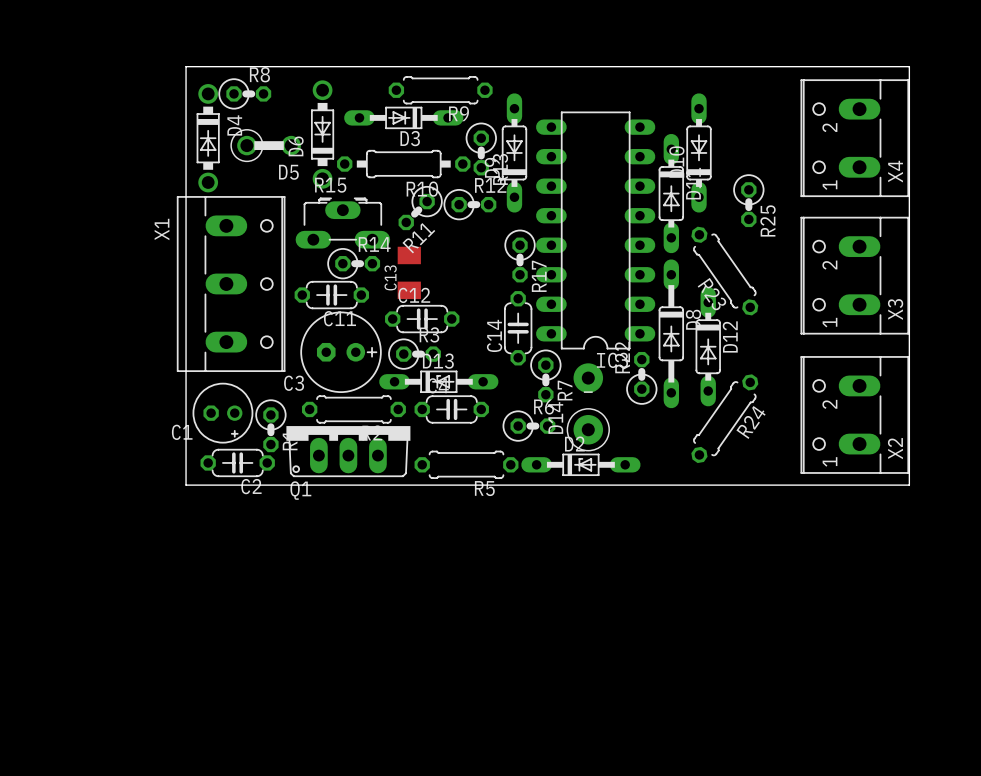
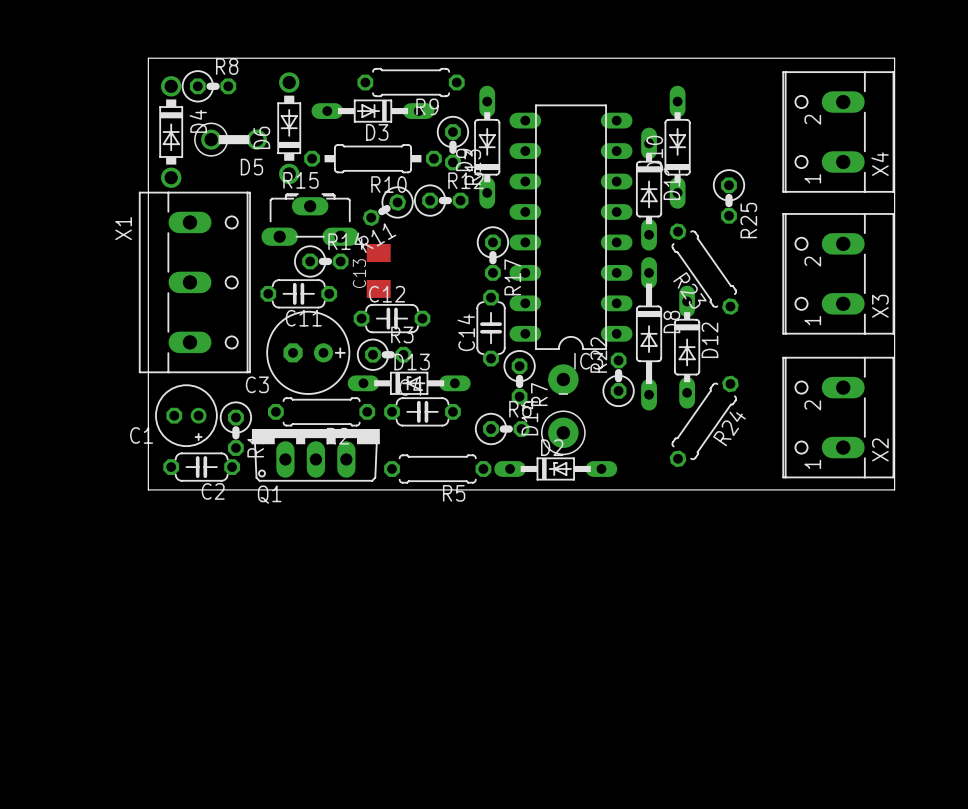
R11 rotation: 0° (420, 208) -> 15° clockwise (388, 206)

